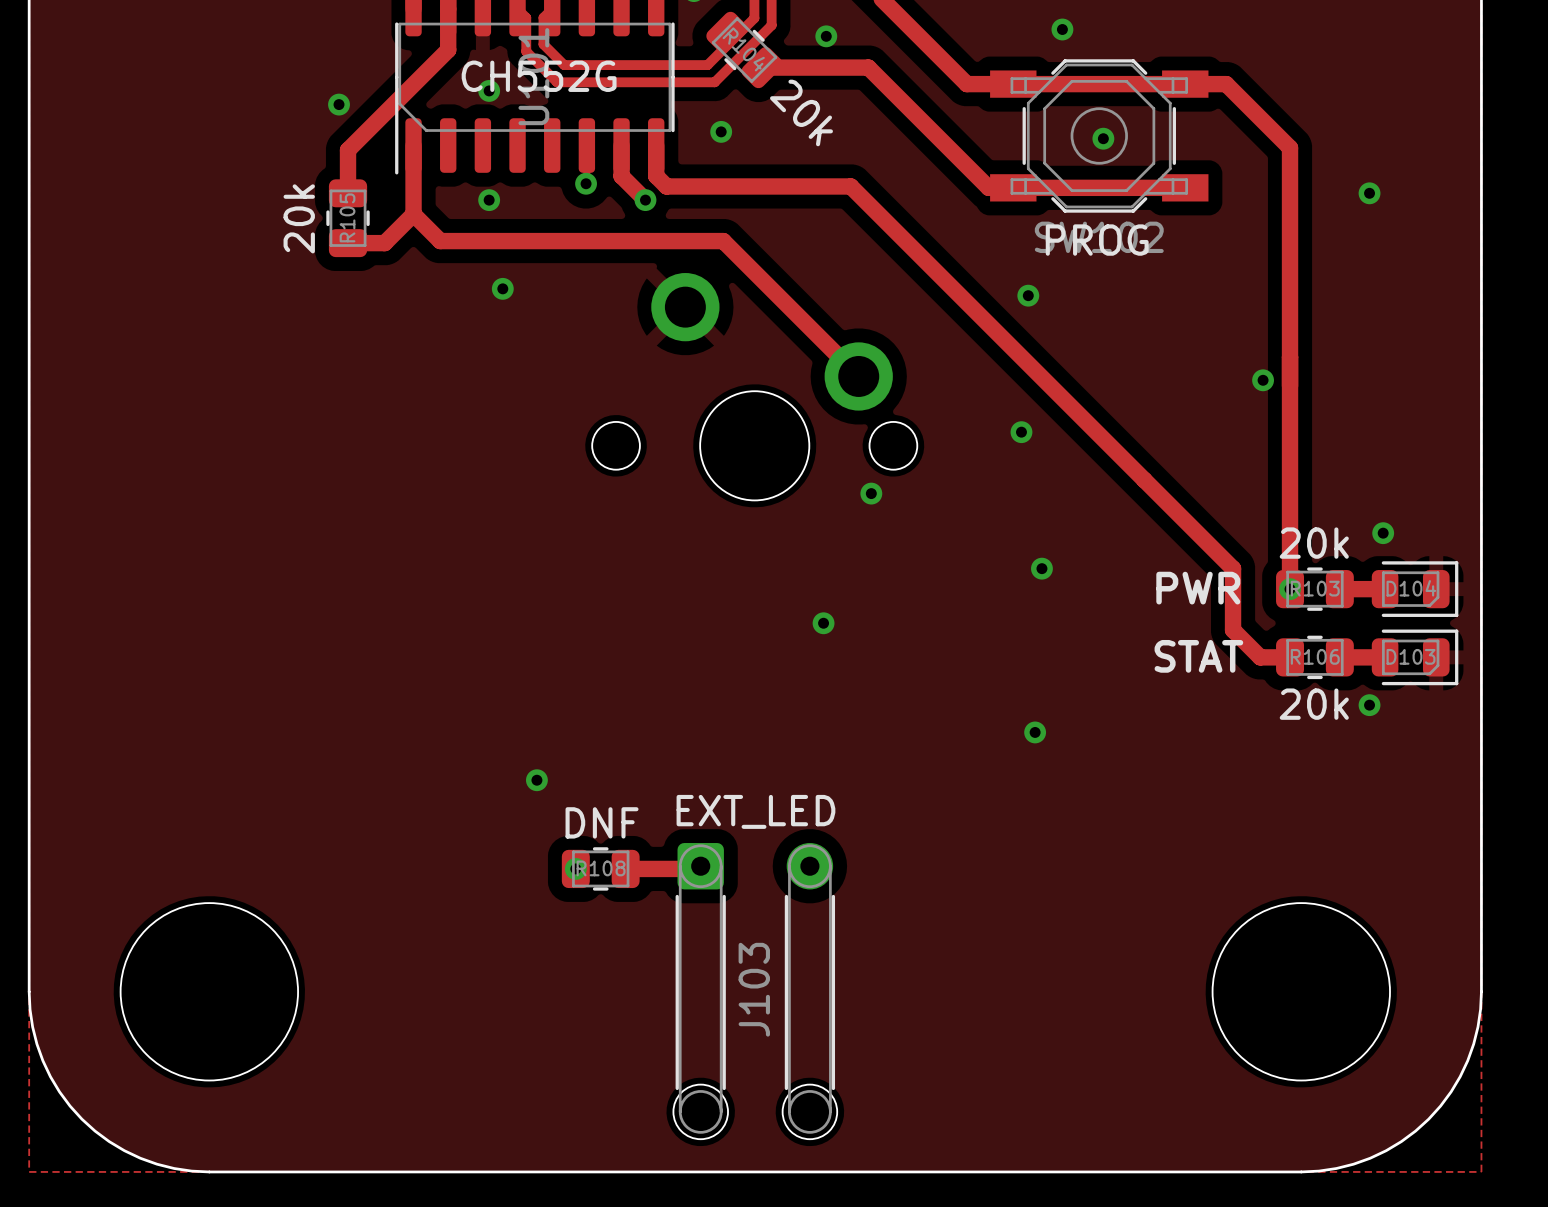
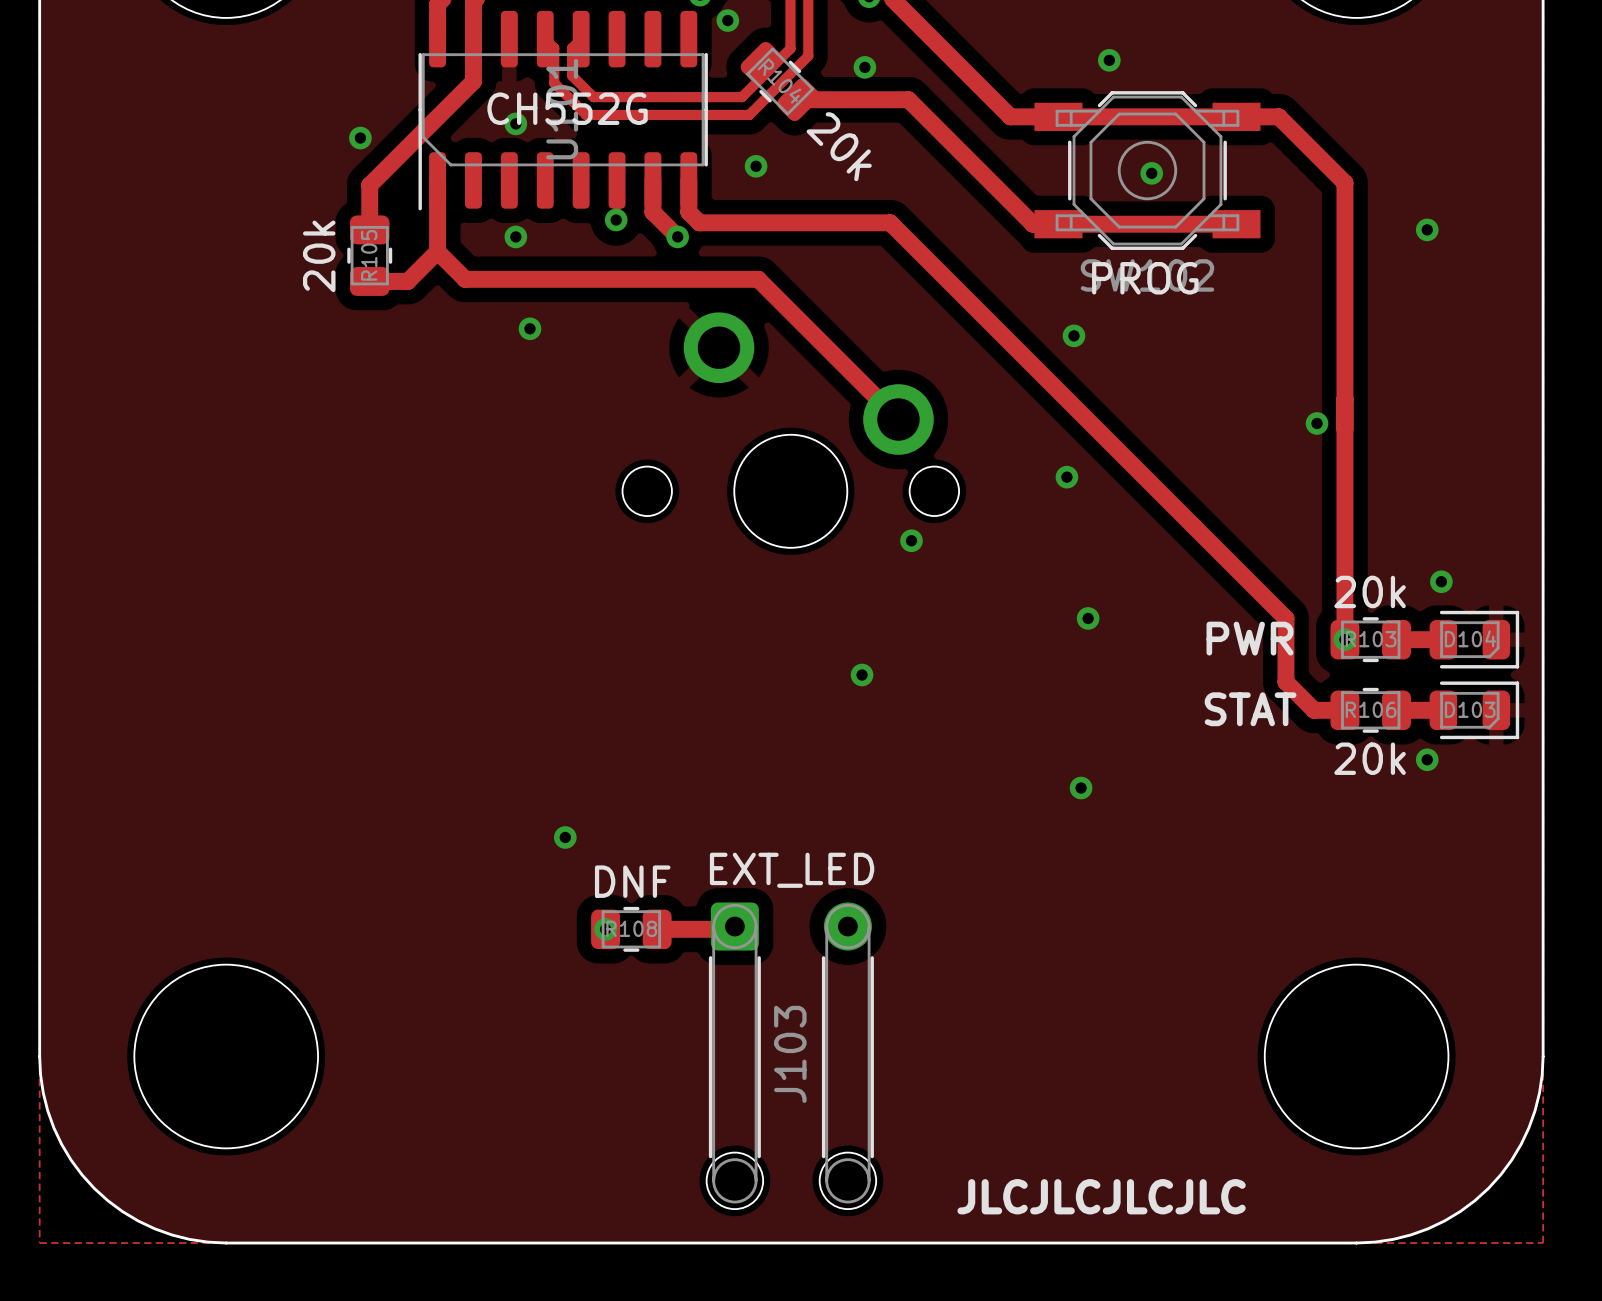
text: none -> JLCJLCJLCJLC (1101, 1196)

